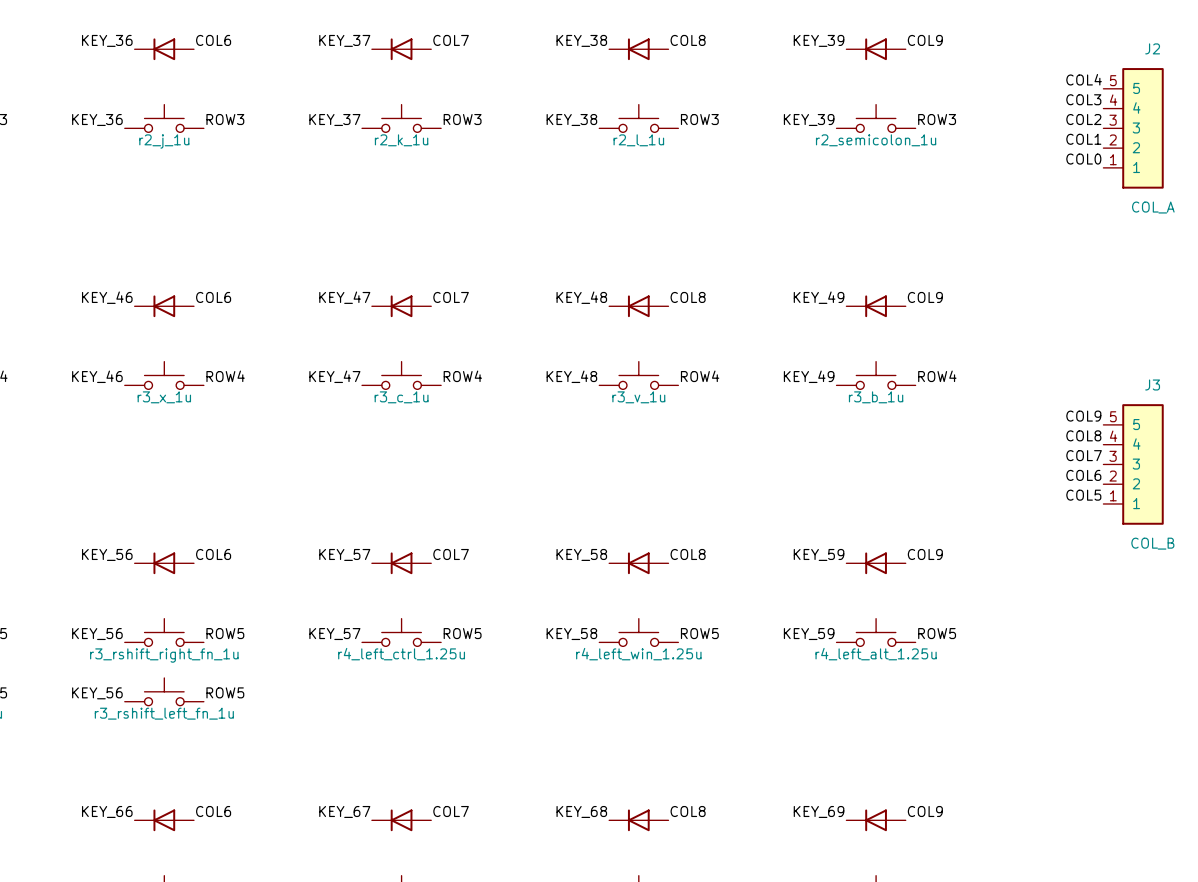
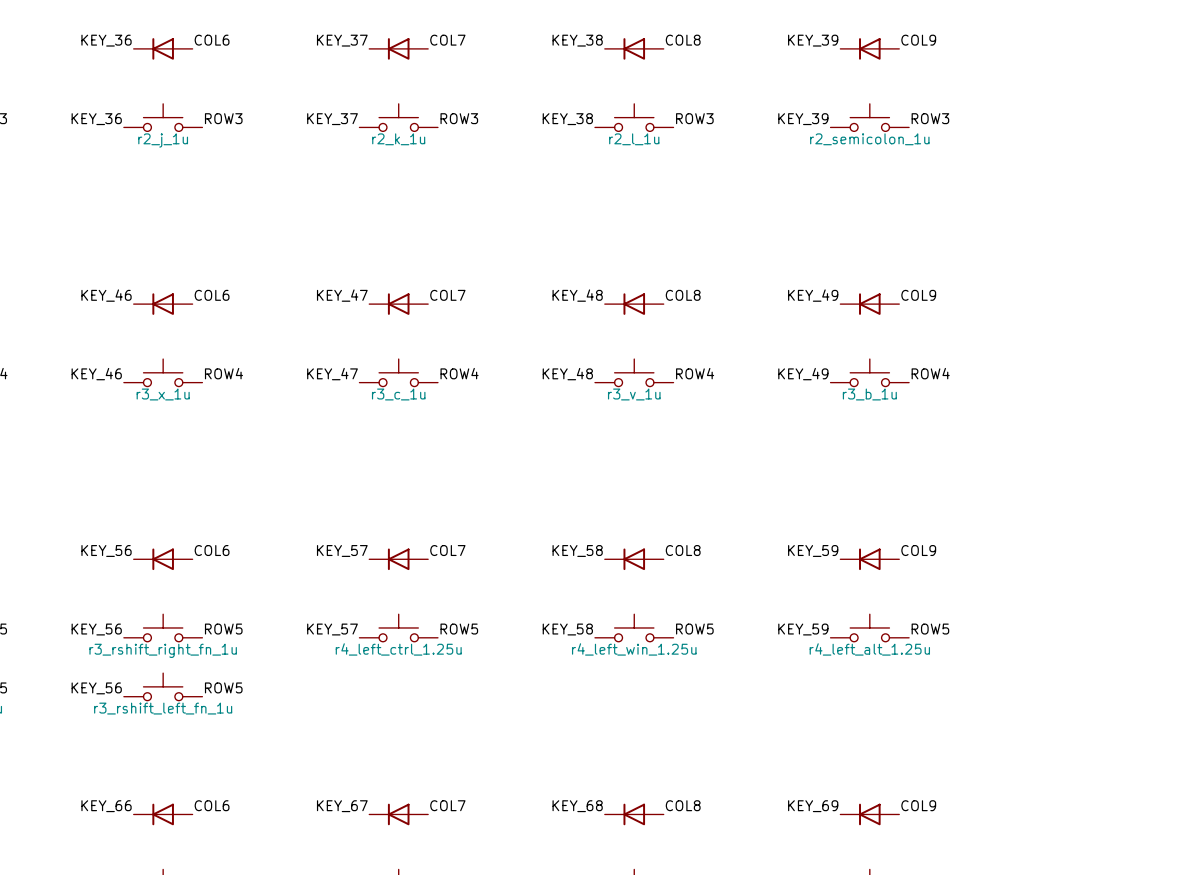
label: COL4 (1084, 79) -> none
label: COL3 (1083, 99) -> none
label: COL2 (1083, 119) -> none
J2: COL_A (1133, 128) -> none
label: COL1 (1083, 139) -> none
label: COL0 (1083, 159) -> none
label: COL9 (1083, 416) -> none
label: COL8 (1083, 435) -> none
label: COL7 (1084, 455) -> none
J3: COL_B (1133, 464) -> none
label: COL6 (1083, 475) -> none
label: COL5 (1083, 495) -> none

